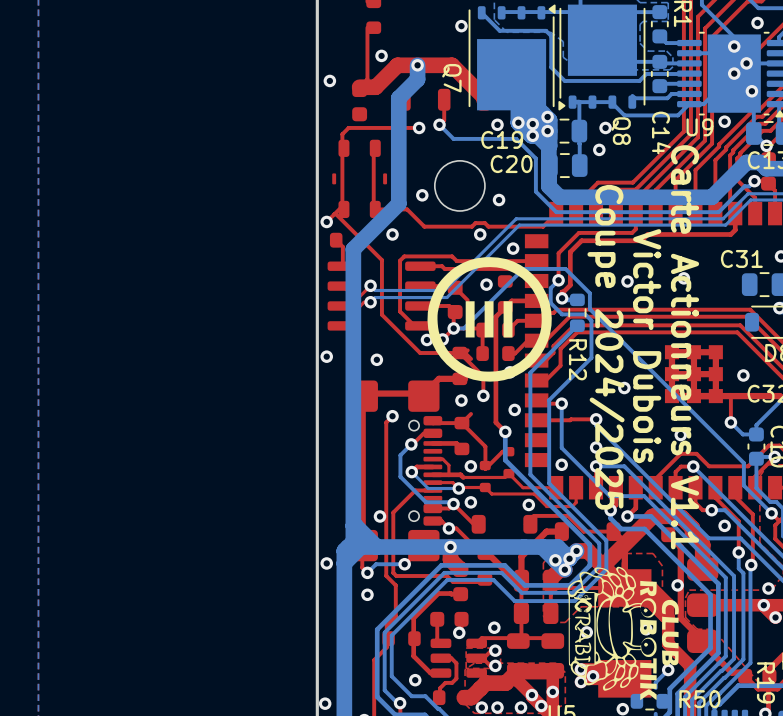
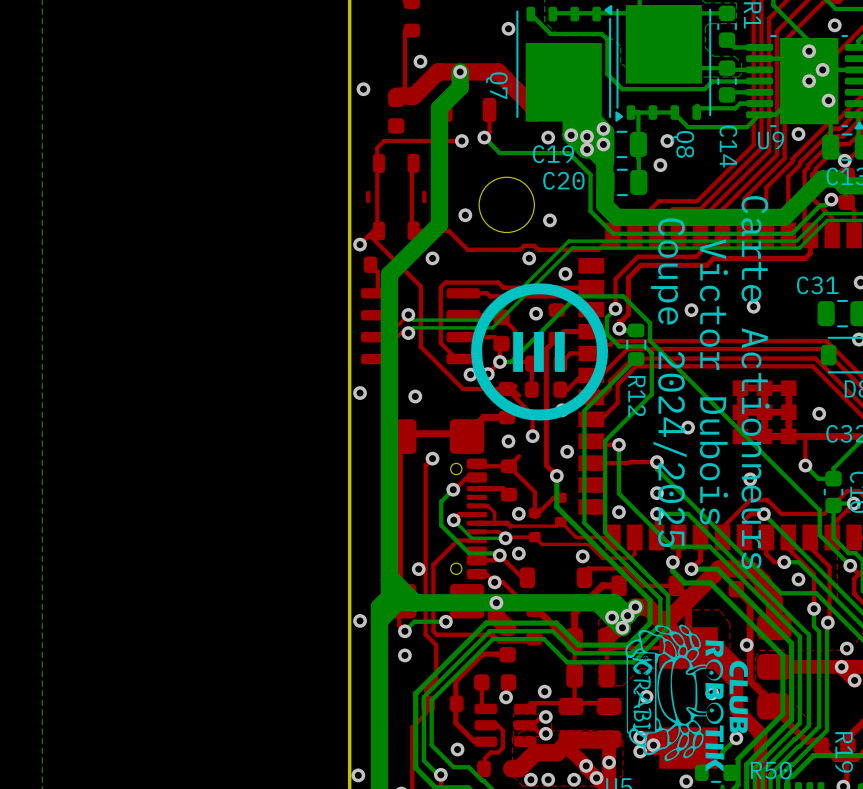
text: Carte Actionneurs V1.1 (685, 347) -> Carte Actionneurs (755, 382)

